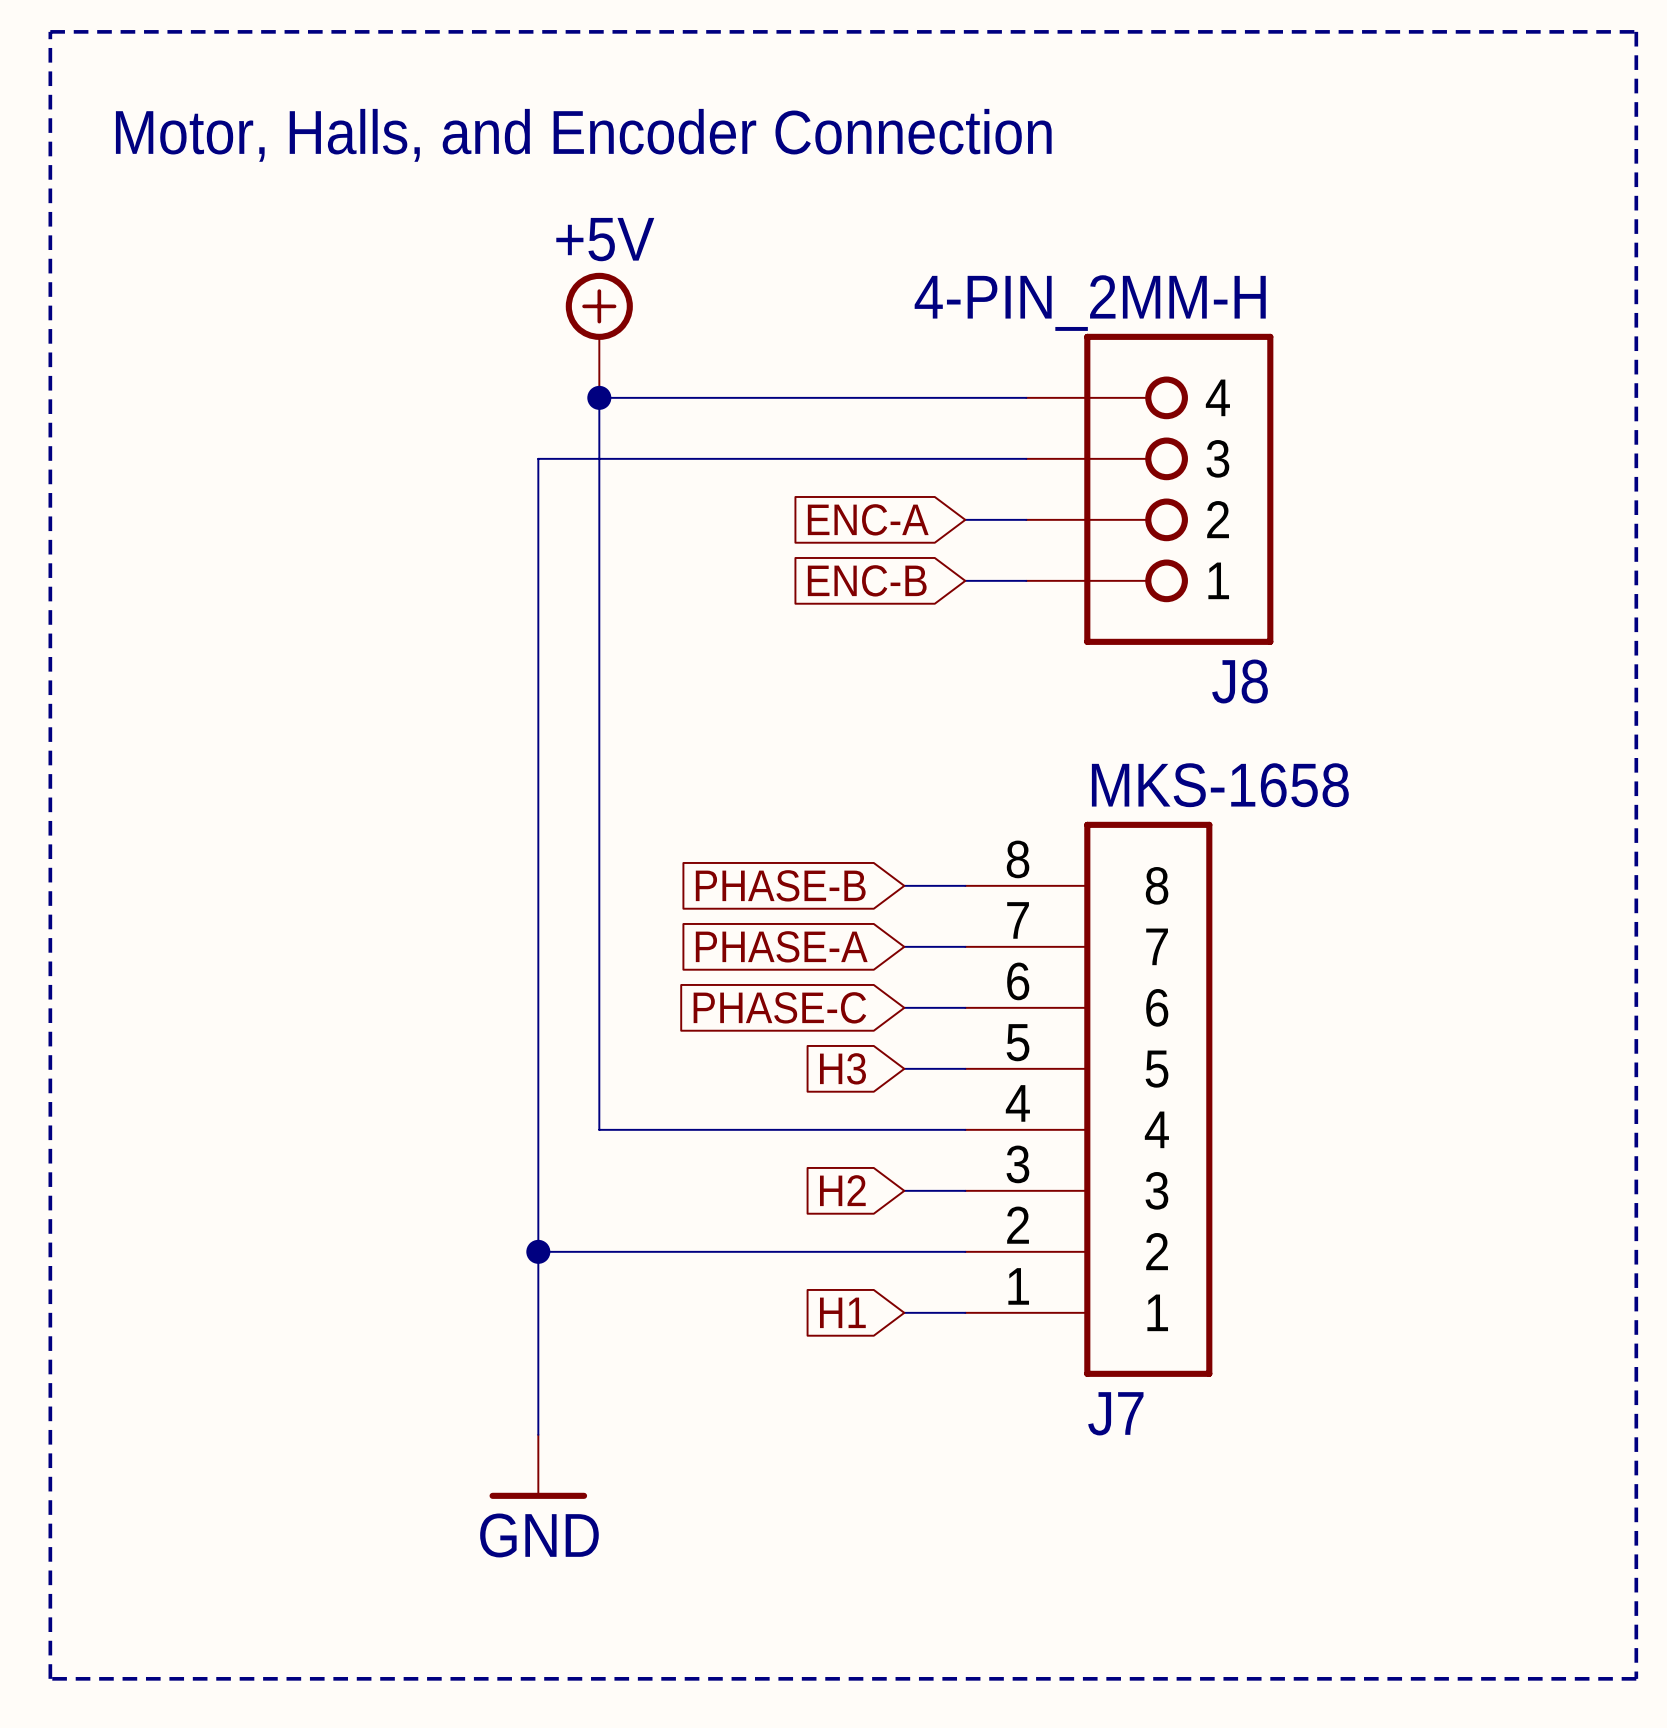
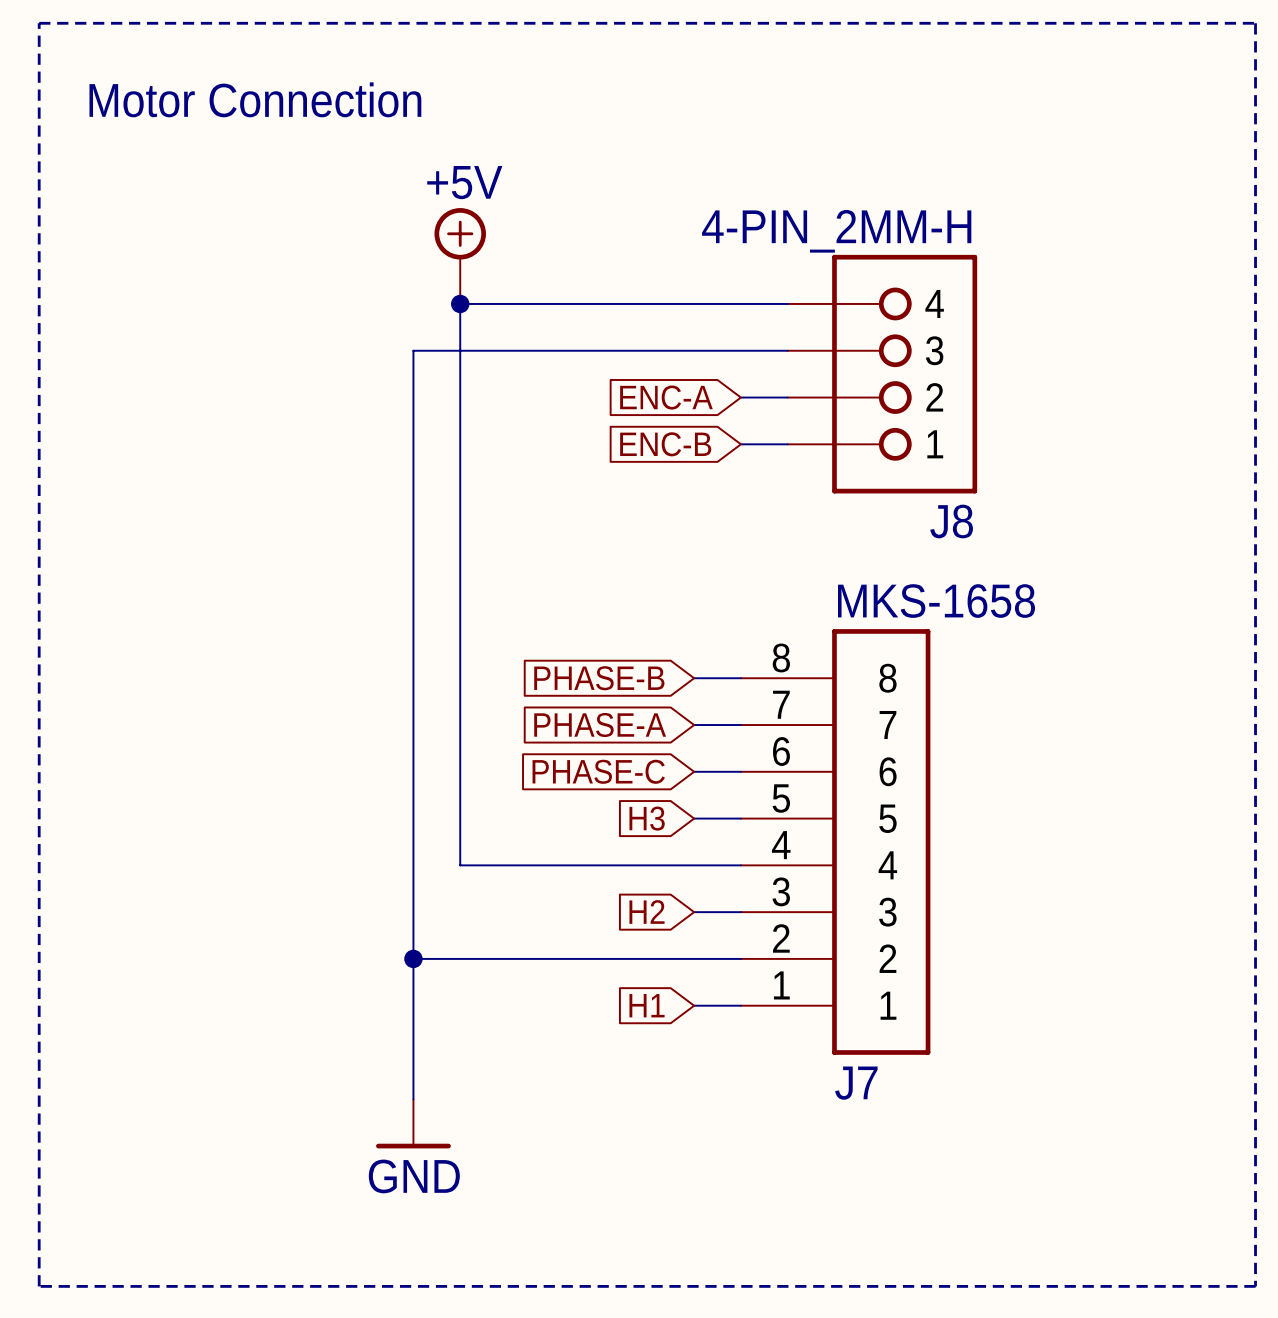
text: Motor, Halls, and Encoder Connection (583, 135) -> Motor Connection (255, 99)

